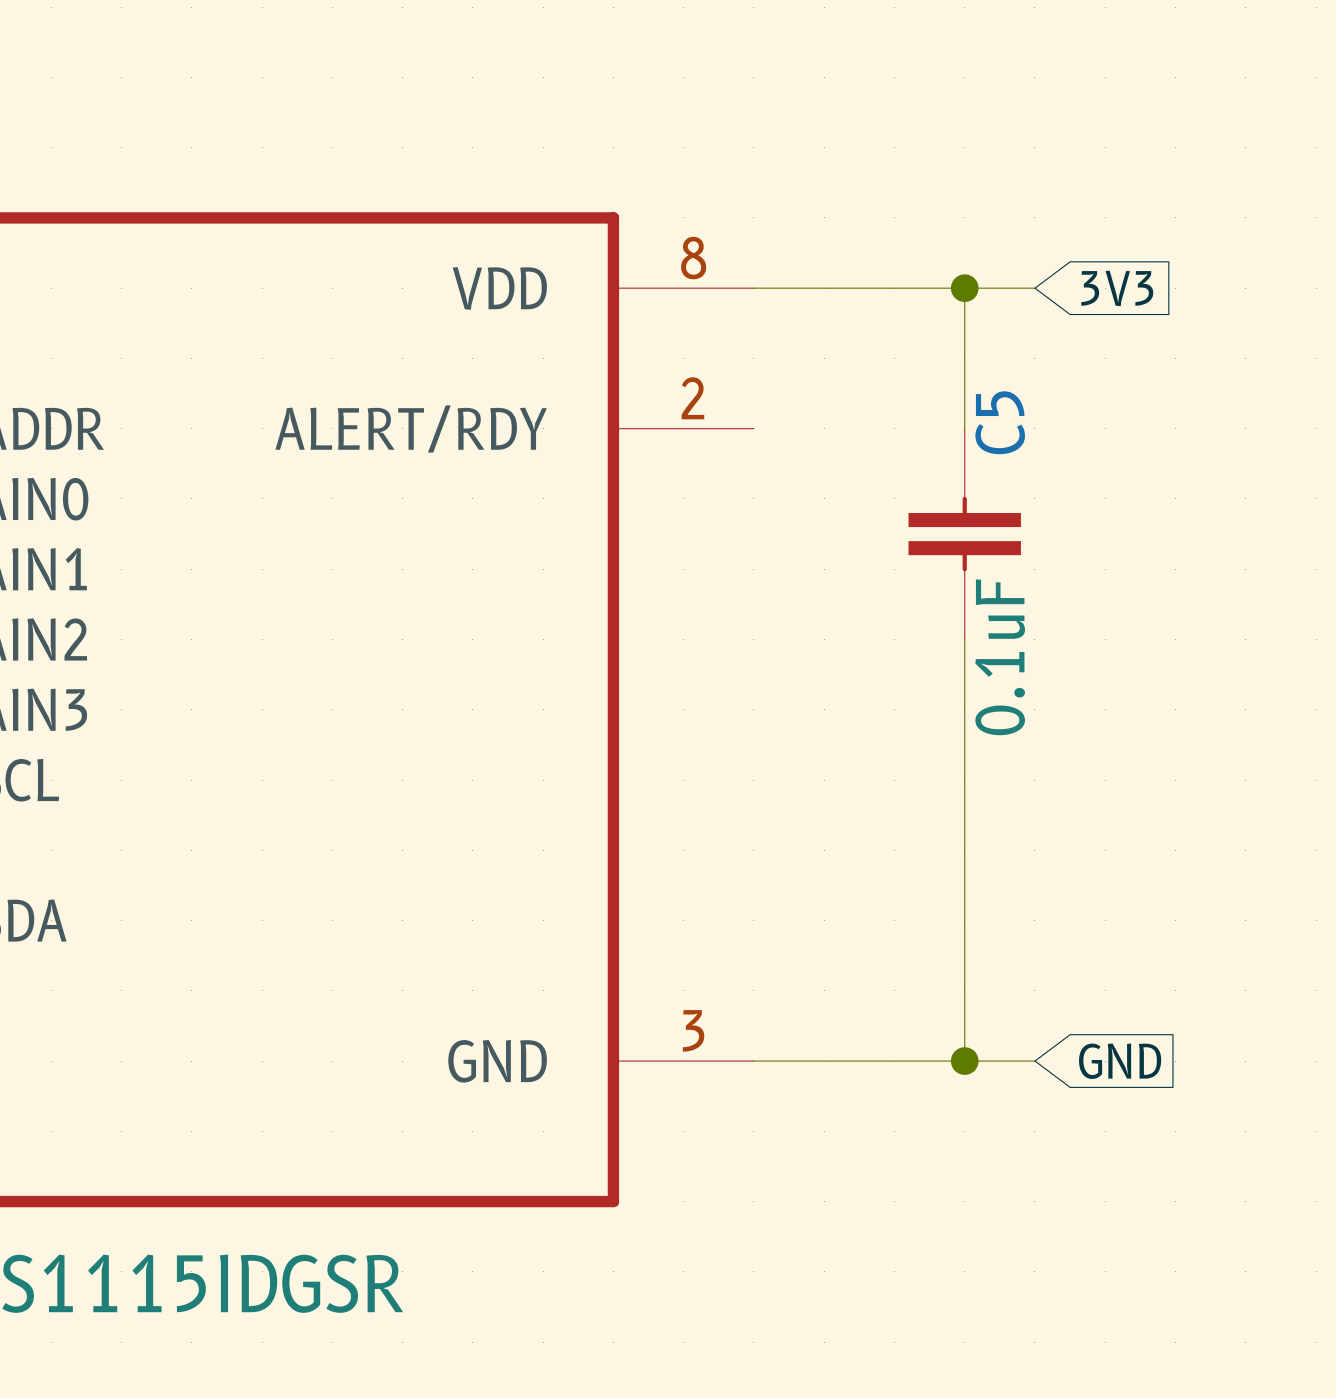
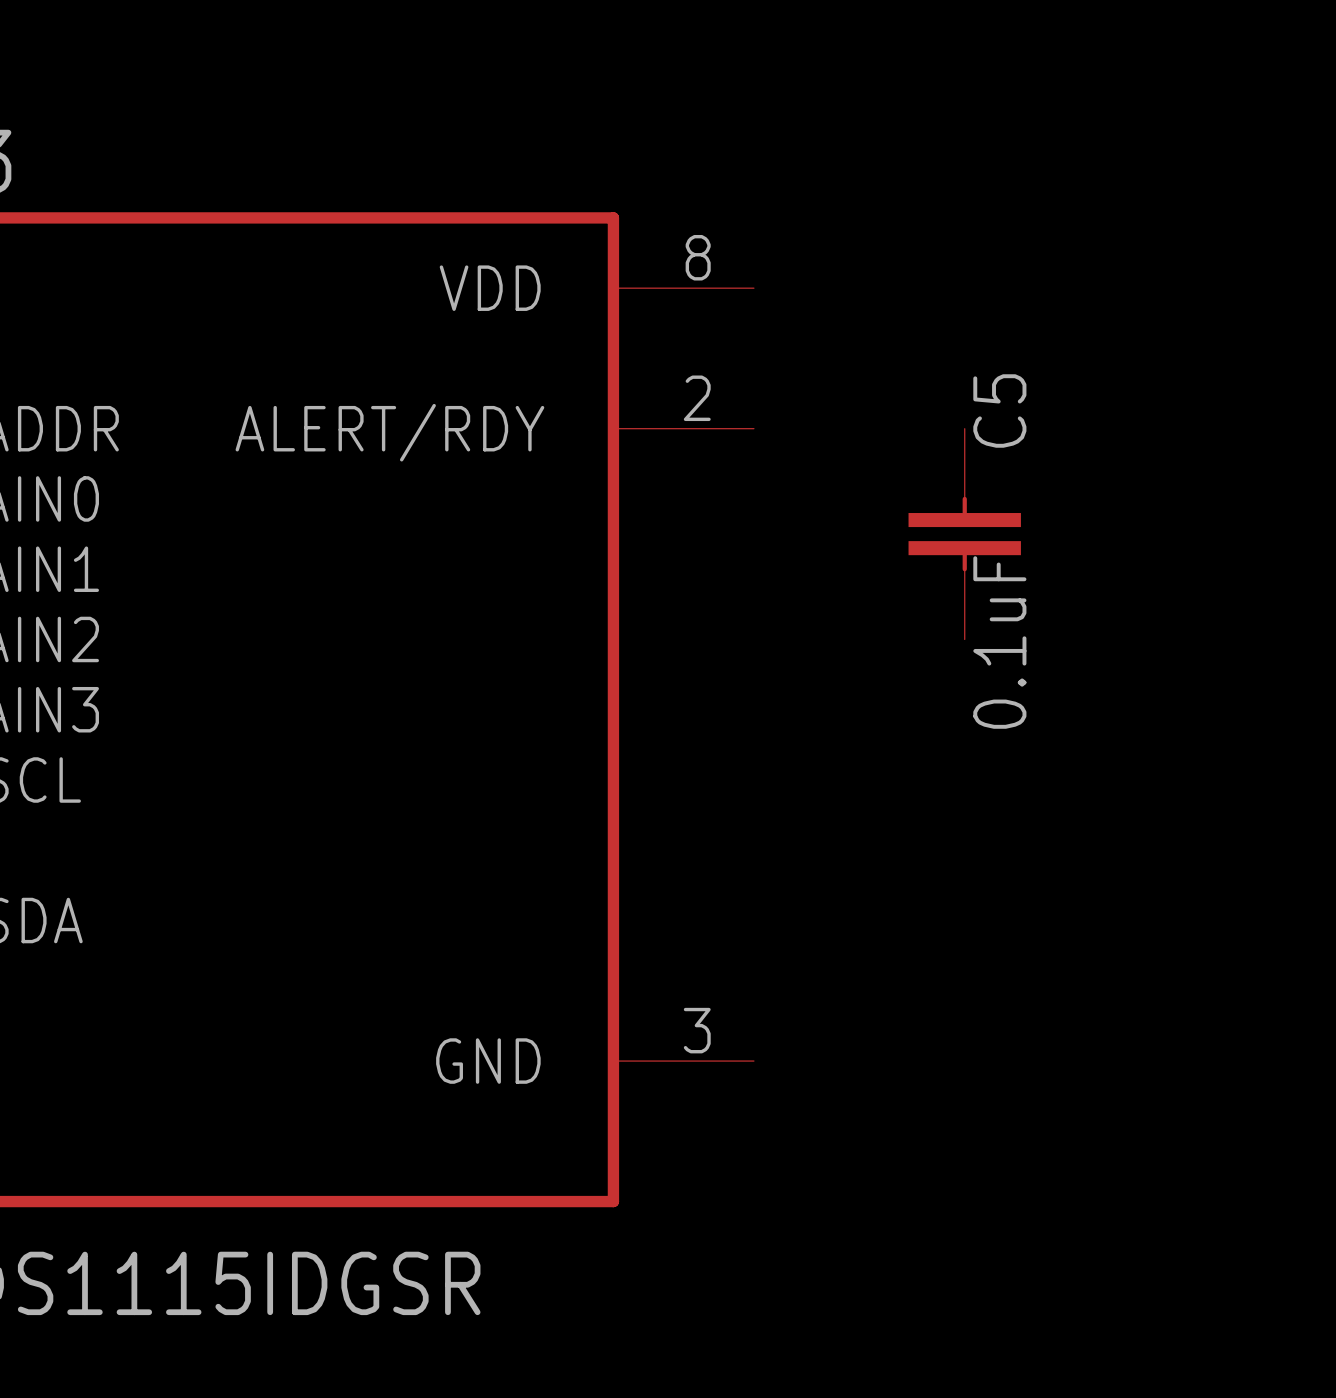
wire: (753, 288) (1034, 288) -> none
wire: (964, 288) (964, 428) -> none
junction: (964, 288) -> none
global label: 3V3 (1117, 288) -> none
wire: (964, 639) (964, 1061) -> none
wire: (753, 1061) (1034, 1061) -> none
junction: (964, 1061) -> none
global label: GND (1120, 1061) -> none

